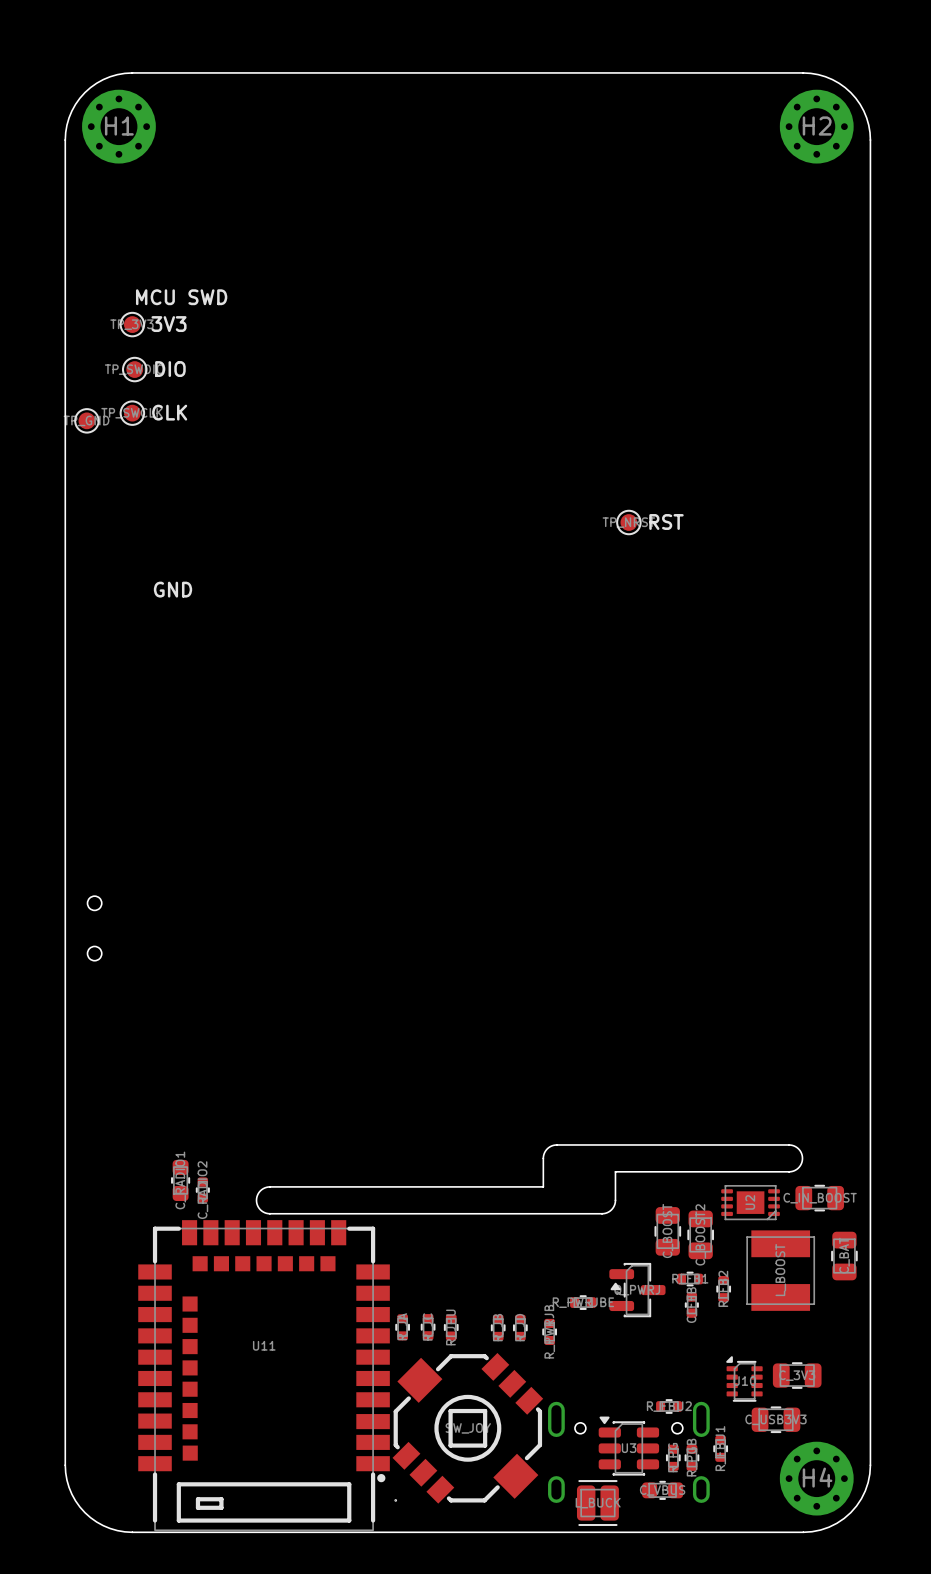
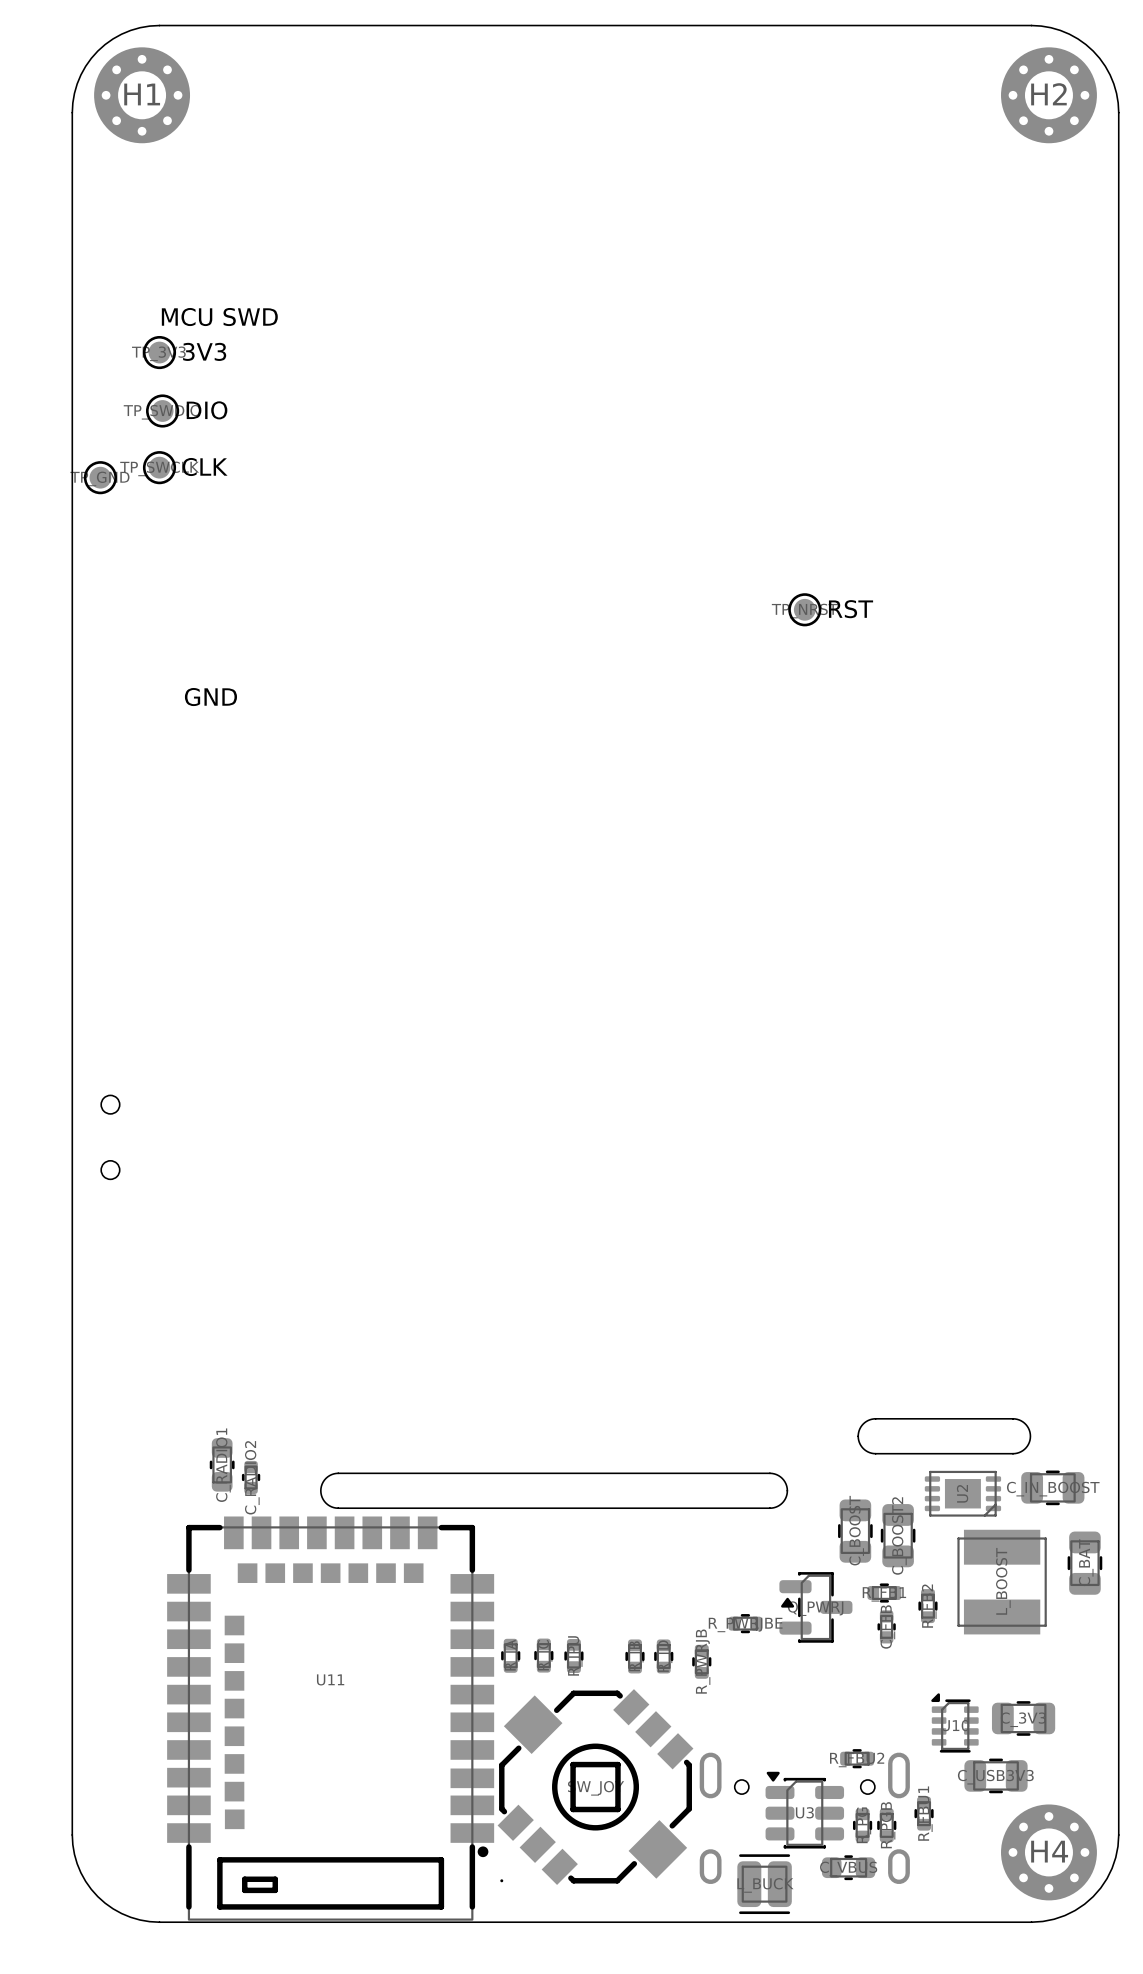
board edge: (683, 1144) (552, 1145) (546, 1150) (543, 1155) (543, 1186) -> (769, 1508) (780, 1504) (786, 1494) (785, 1482) (776, 1474) (693, 1473)
board edge: (683, 1171) (615, 1171) (615, 1203) (610, 1210) (602, 1213) -> (875, 1453) (863, 1448) (858, 1436) (863, 1423) (875, 1418)

